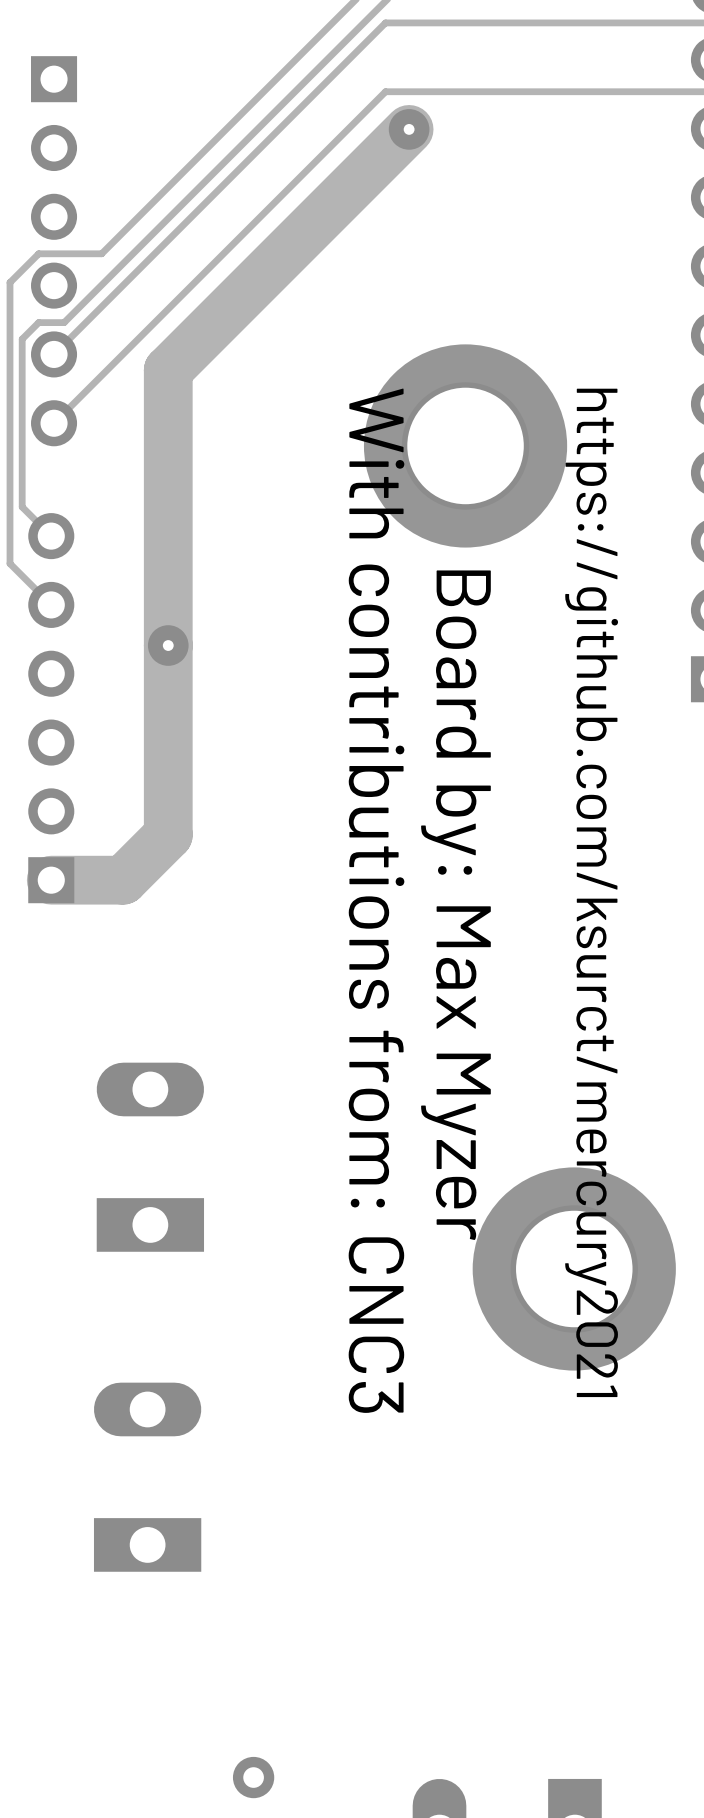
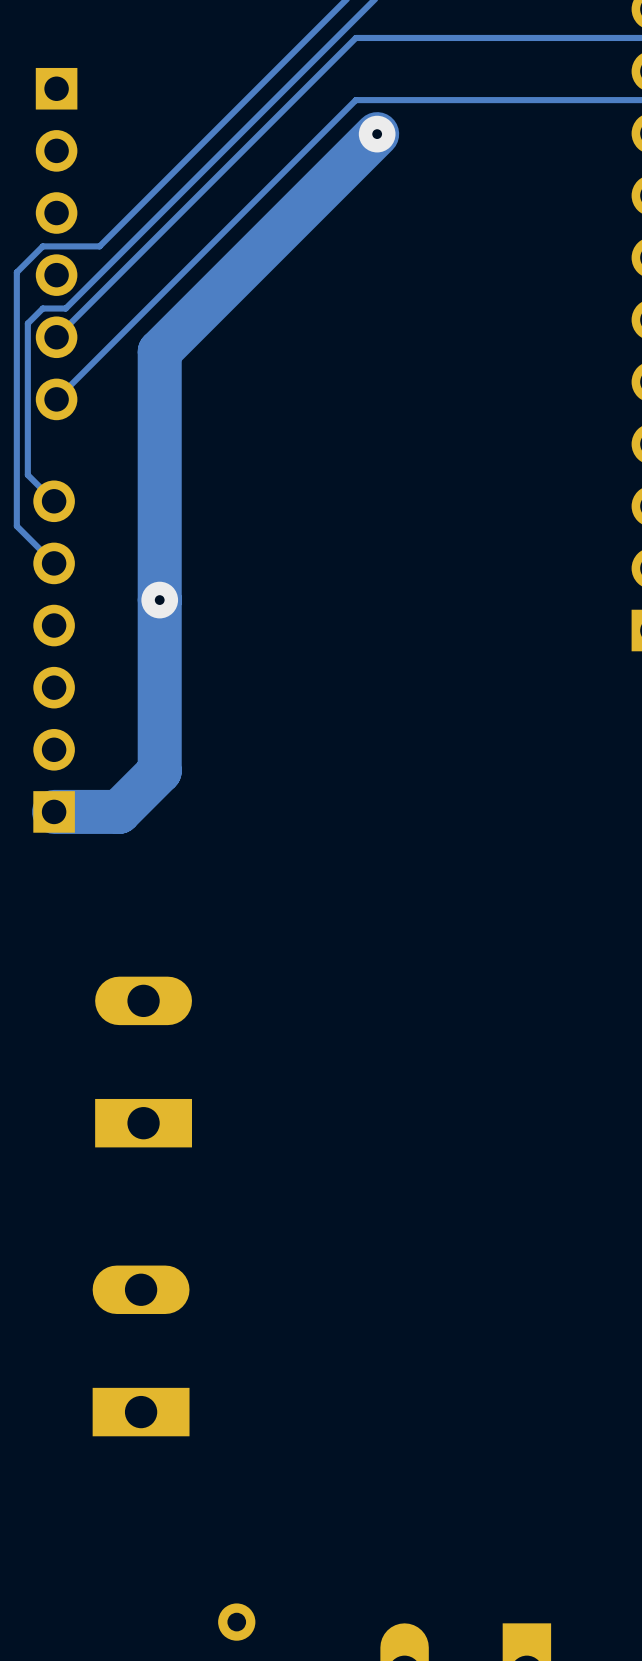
part: (465, 445) -> none
text: https://github.com/ksurct/mercury2021 (591, 892) -> none
text: With contributions from: CNC3 (376, 900) -> none
text: Board by: Max Myzer (455, 905) -> none
part: (574, 1268) -> none

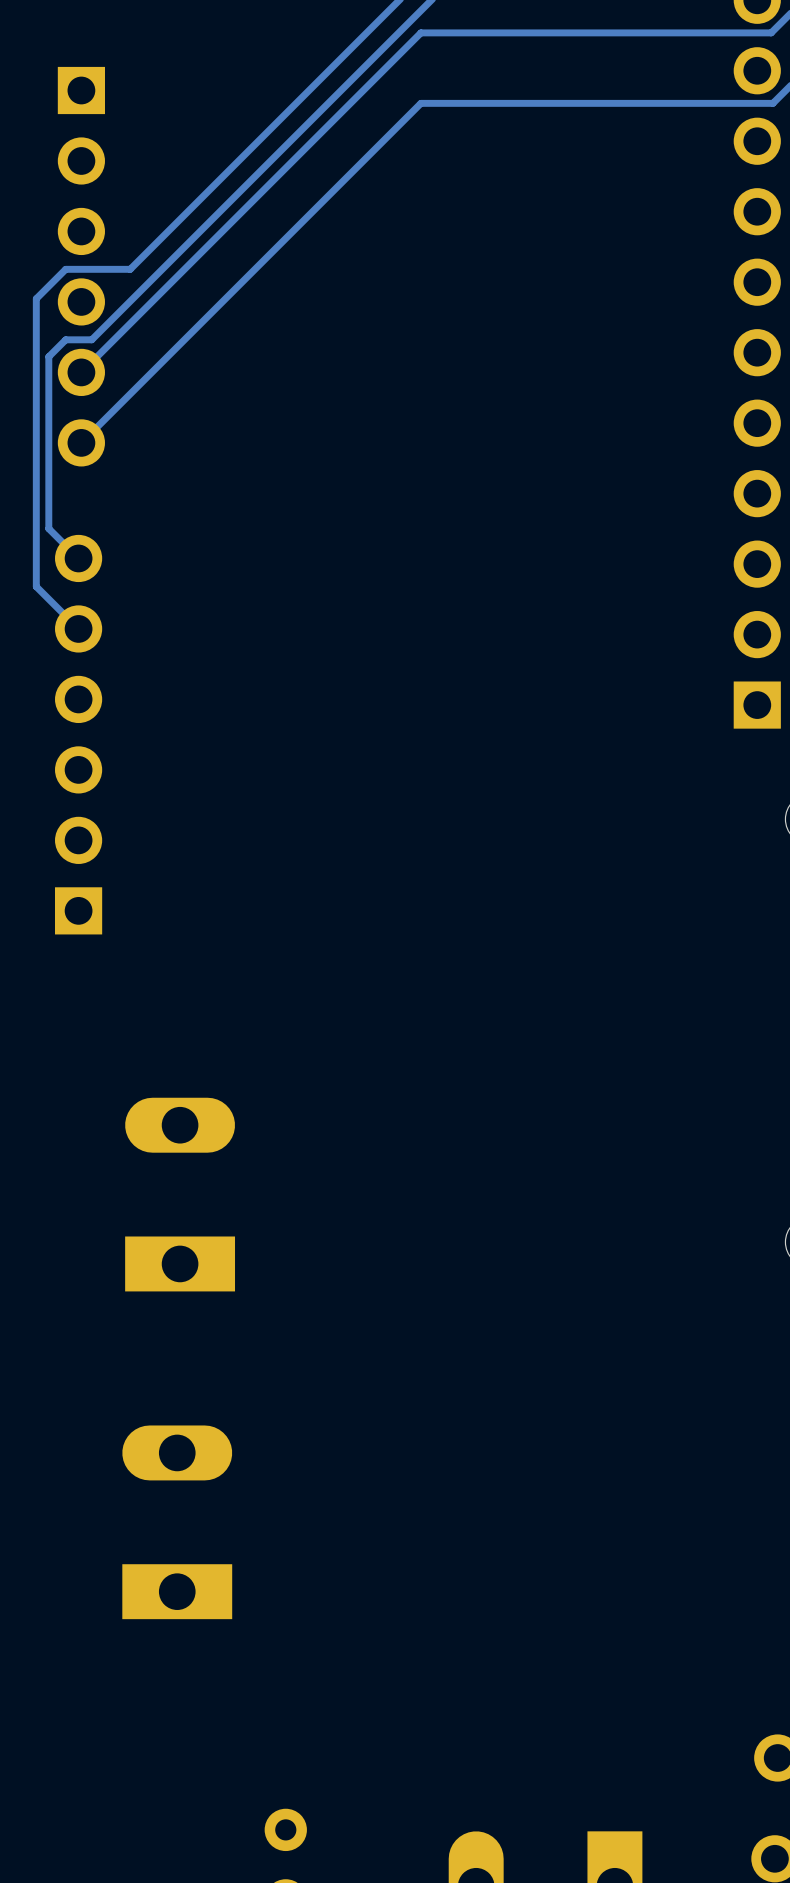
track: (377, 134) (159, 351) (159, 771) (118, 811) (54, 811) -> none
via: (377, 134) -> none
via: (159, 600) -> none

